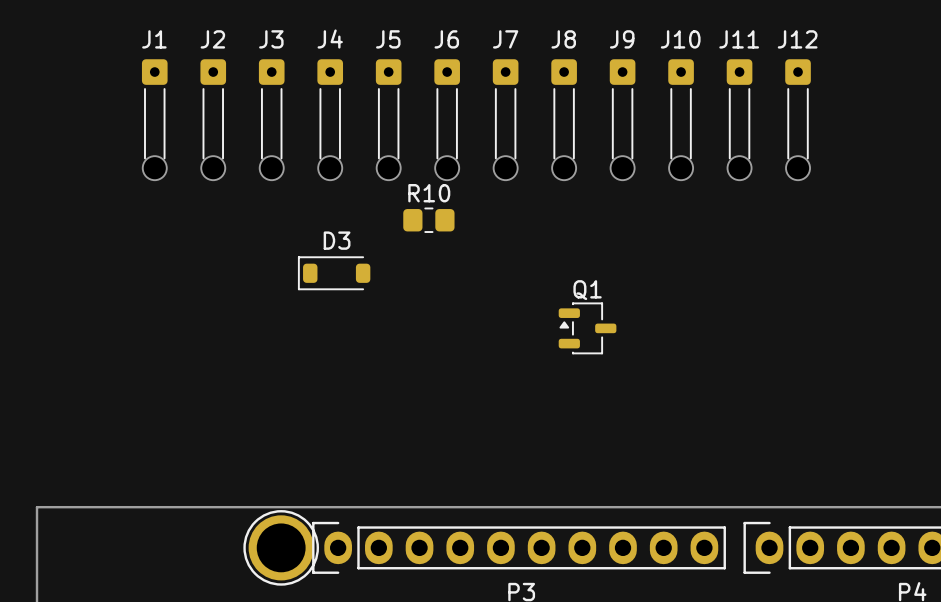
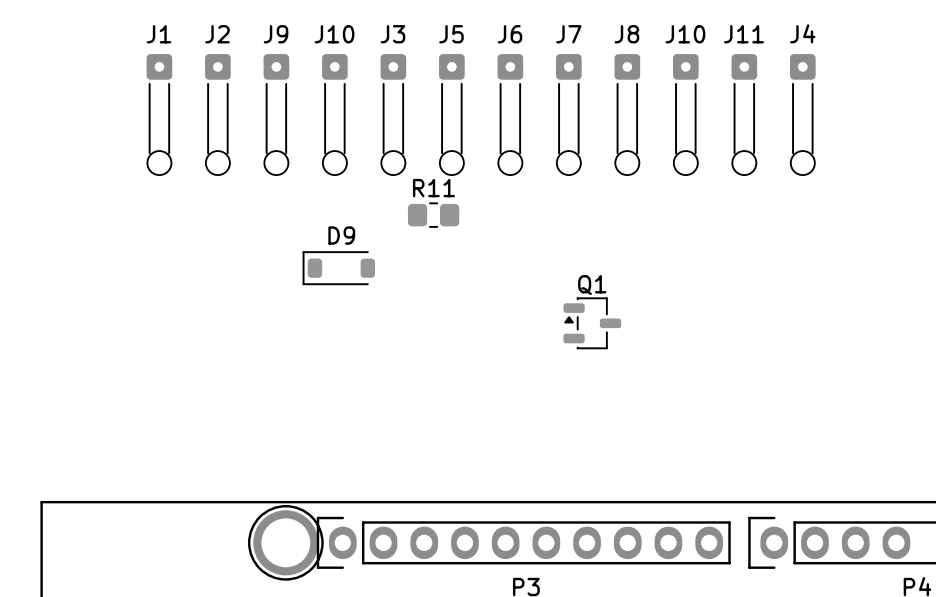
J3 name: J3 (271, 39) -> J9 (276, 34)
J4 name: J4 (330, 39) -> J10 (334, 34)
J5 name: J5 (388, 39) -> J3 (392, 34)
J6 name: J6 (446, 39) -> J5 (451, 34)
J7 name: J7 (505, 39) -> J6 (509, 34)
J8 name: J8 (563, 39) -> J7 (568, 34)
J9 name: J9 (622, 39) -> J8 (626, 34)
J12 name: J12 (797, 39) -> J4 (802, 33)
R10 name: R10 (429, 193) -> R11 (433, 188)
D3 name: D3 (337, 240) -> D9 (341, 235)

